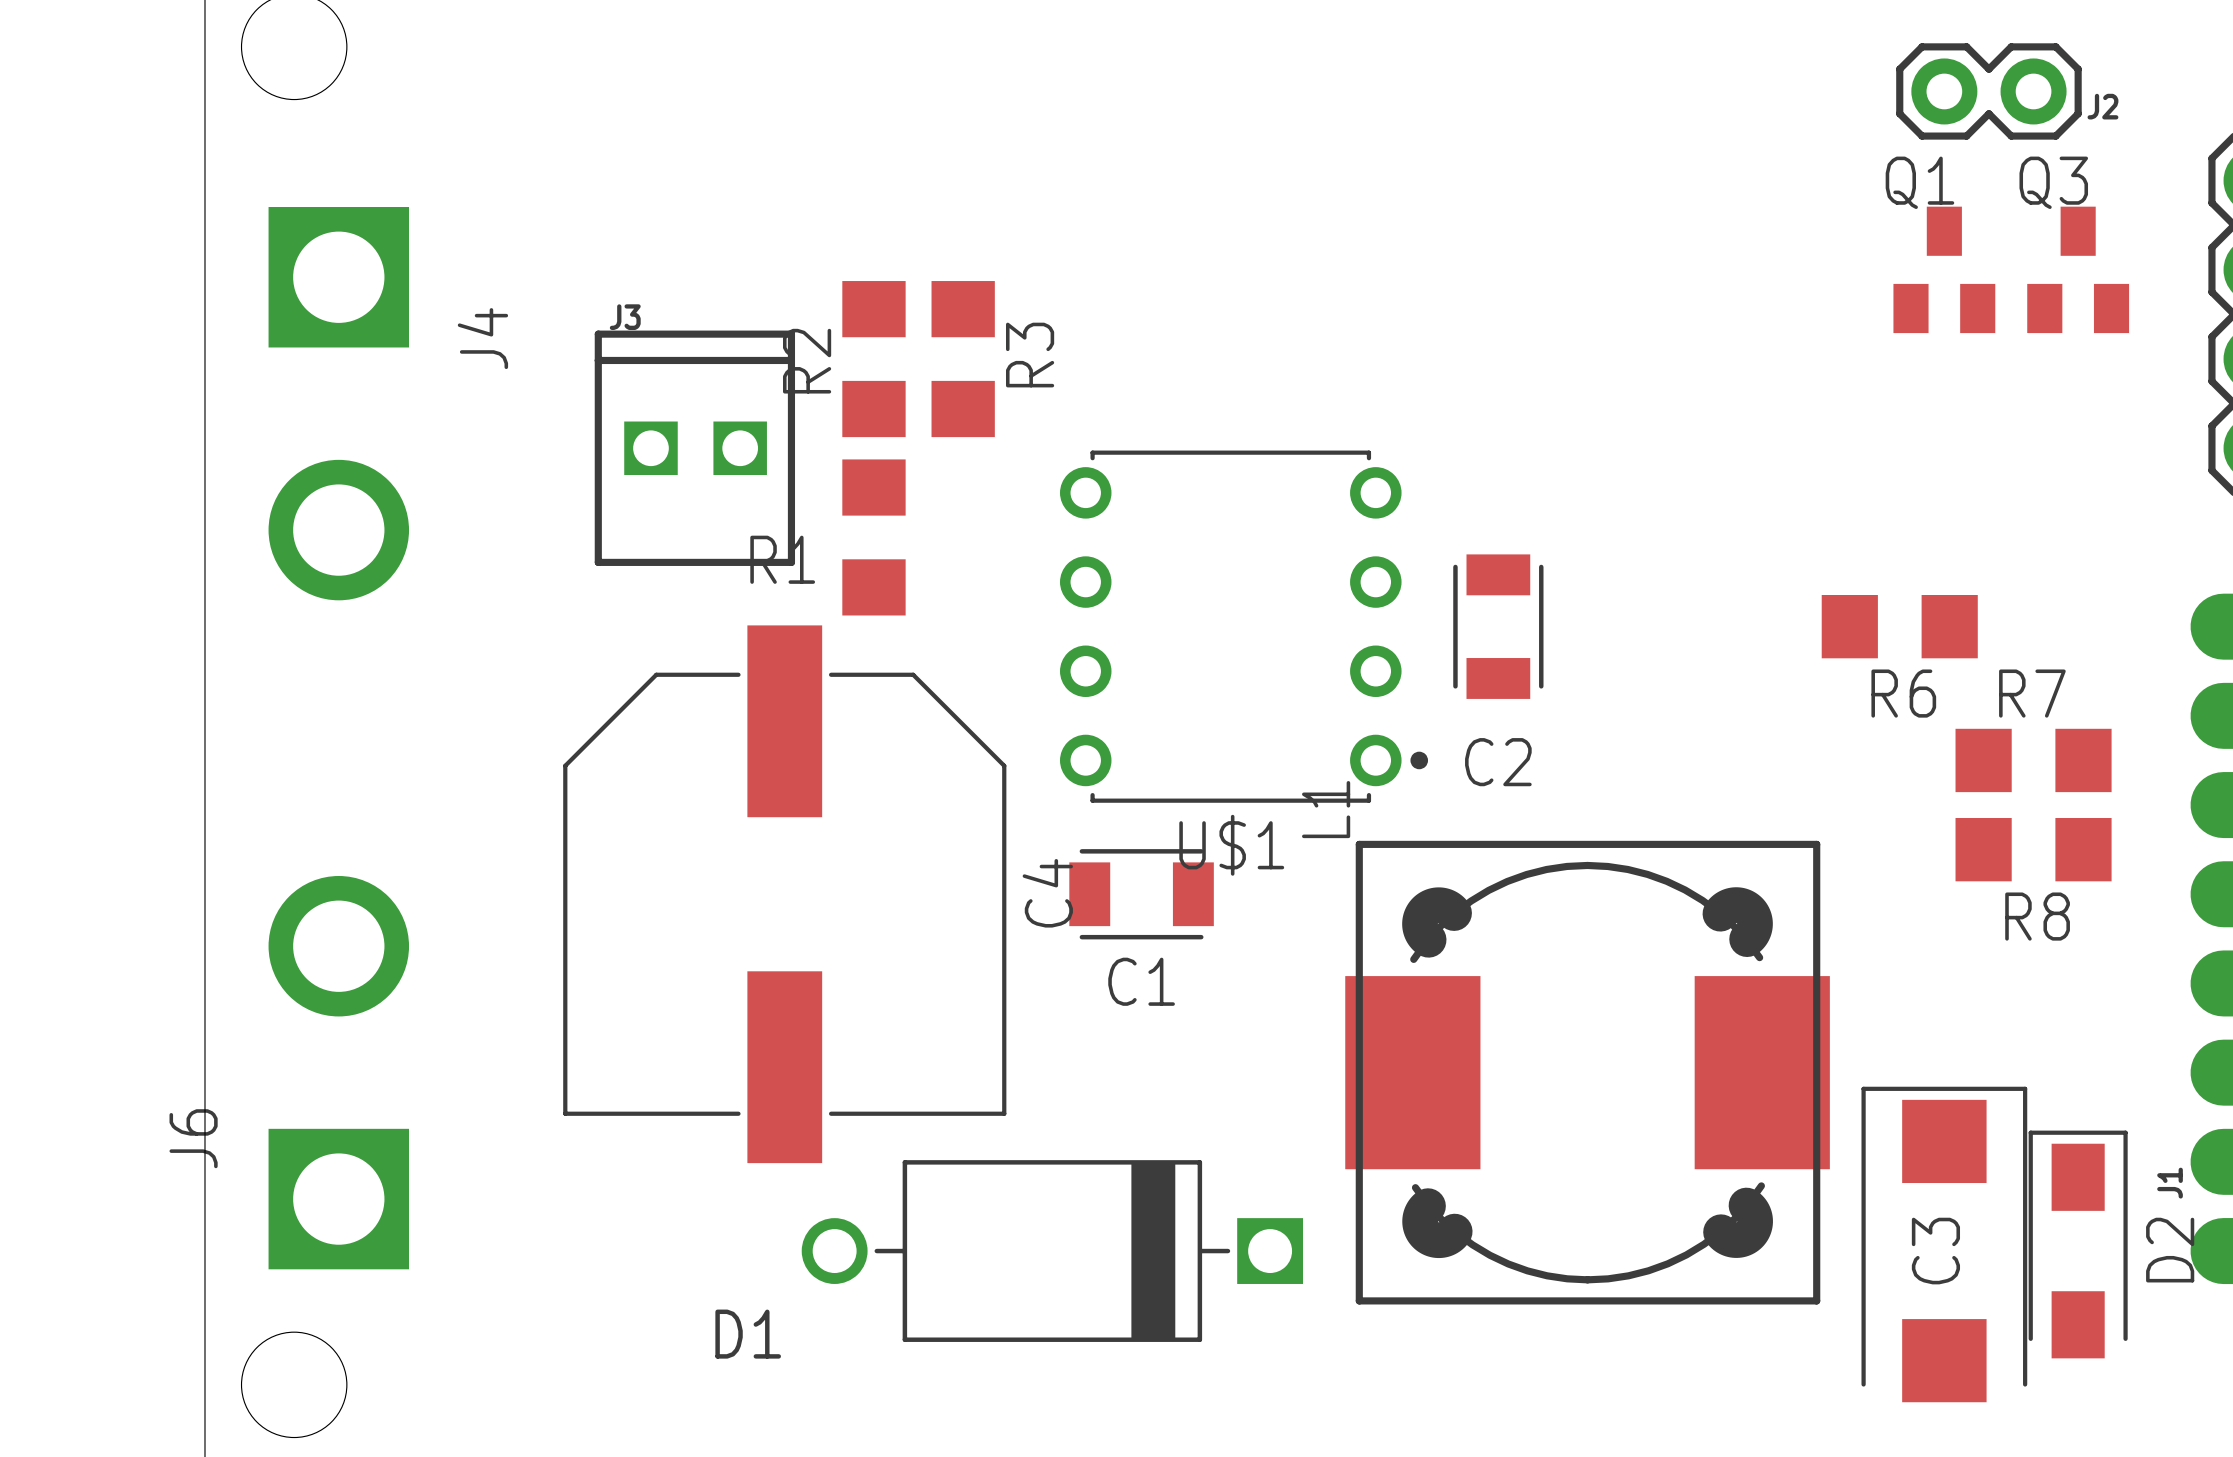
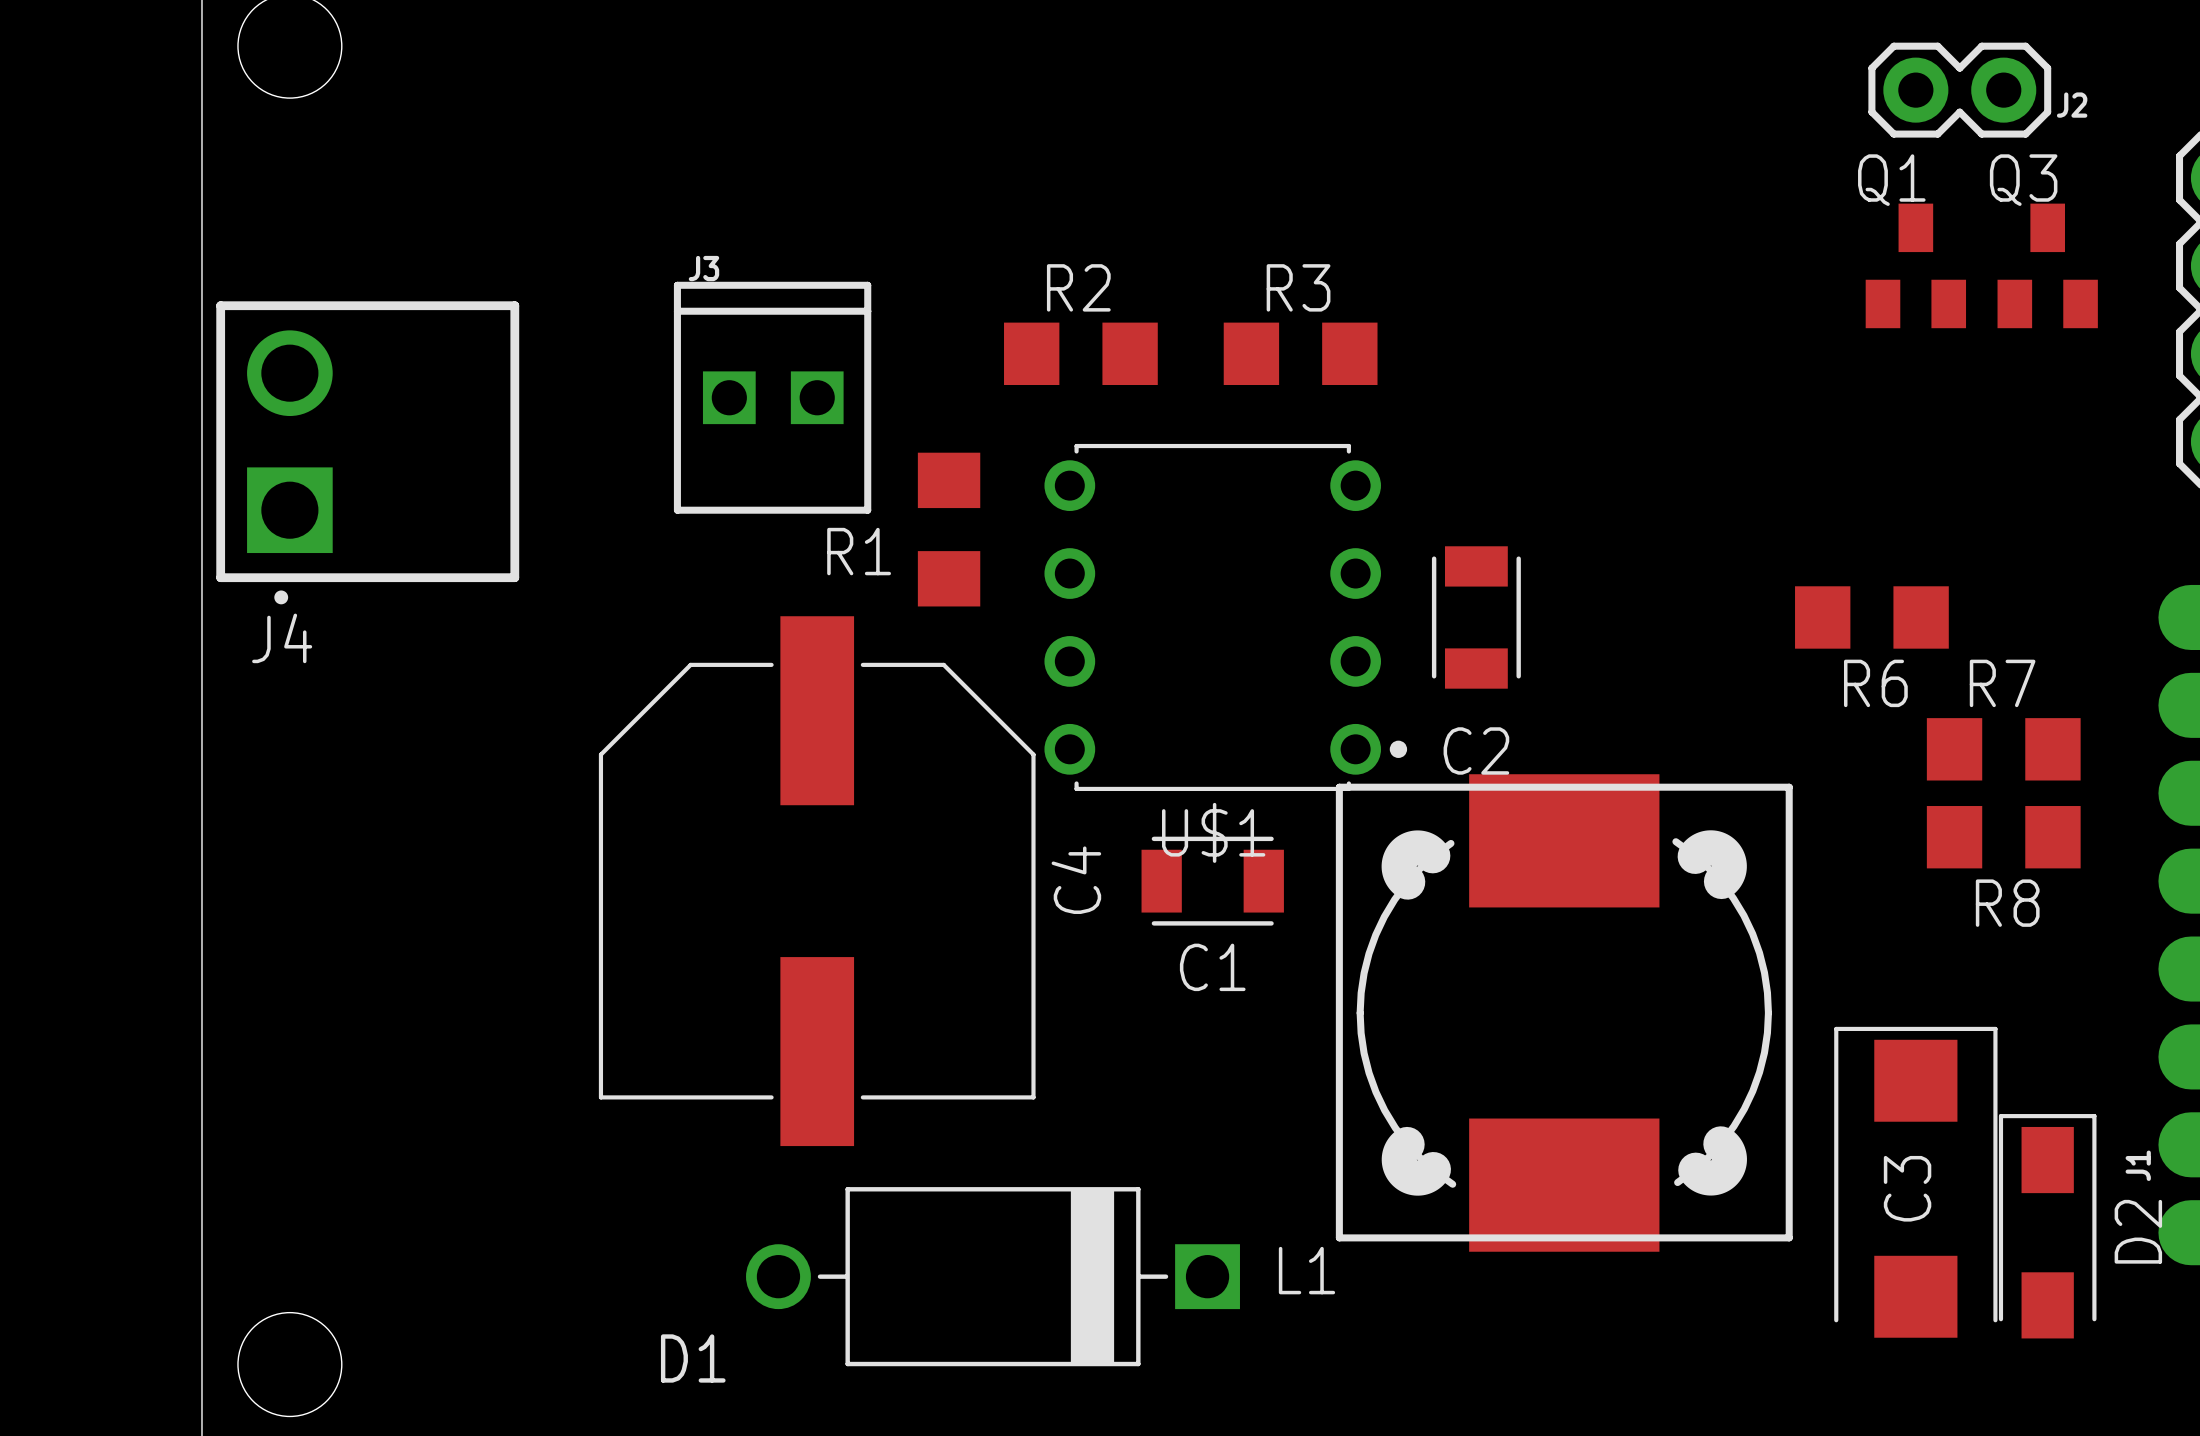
J4 footprint: [268, 207, 410, 601] -> [216, 301, 520, 605]
J4 name position: J4 (482, 338) -> J4 (282, 638)
R3 name position: R3 (1030, 355) -> R3 (1298, 287)
R2 rotation: 0° (873, 359) -> 90° clockwise (1080, 353)
R2 position: (873, 359) -> (1080, 353)
R3 rotation: 0° (963, 359) -> 90° clockwise (1300, 353)
R3 position: (963, 359) -> (1300, 353)
J3 position: (694, 448) -> (772, 397)
R1 position: (873, 537) -> (949, 529)
C4 position: (784, 894) -> (817, 881)
C1 position: (1141, 894) -> (1212, 881)
J6: (338, 1072) -> none
L1 rotation: 0° (1587, 1072) -> 90° counterclockwise (1564, 1012)
C3 position: (1944, 1244) -> (1915, 1182)
D1 position: (1052, 1251) -> (993, 1276)

